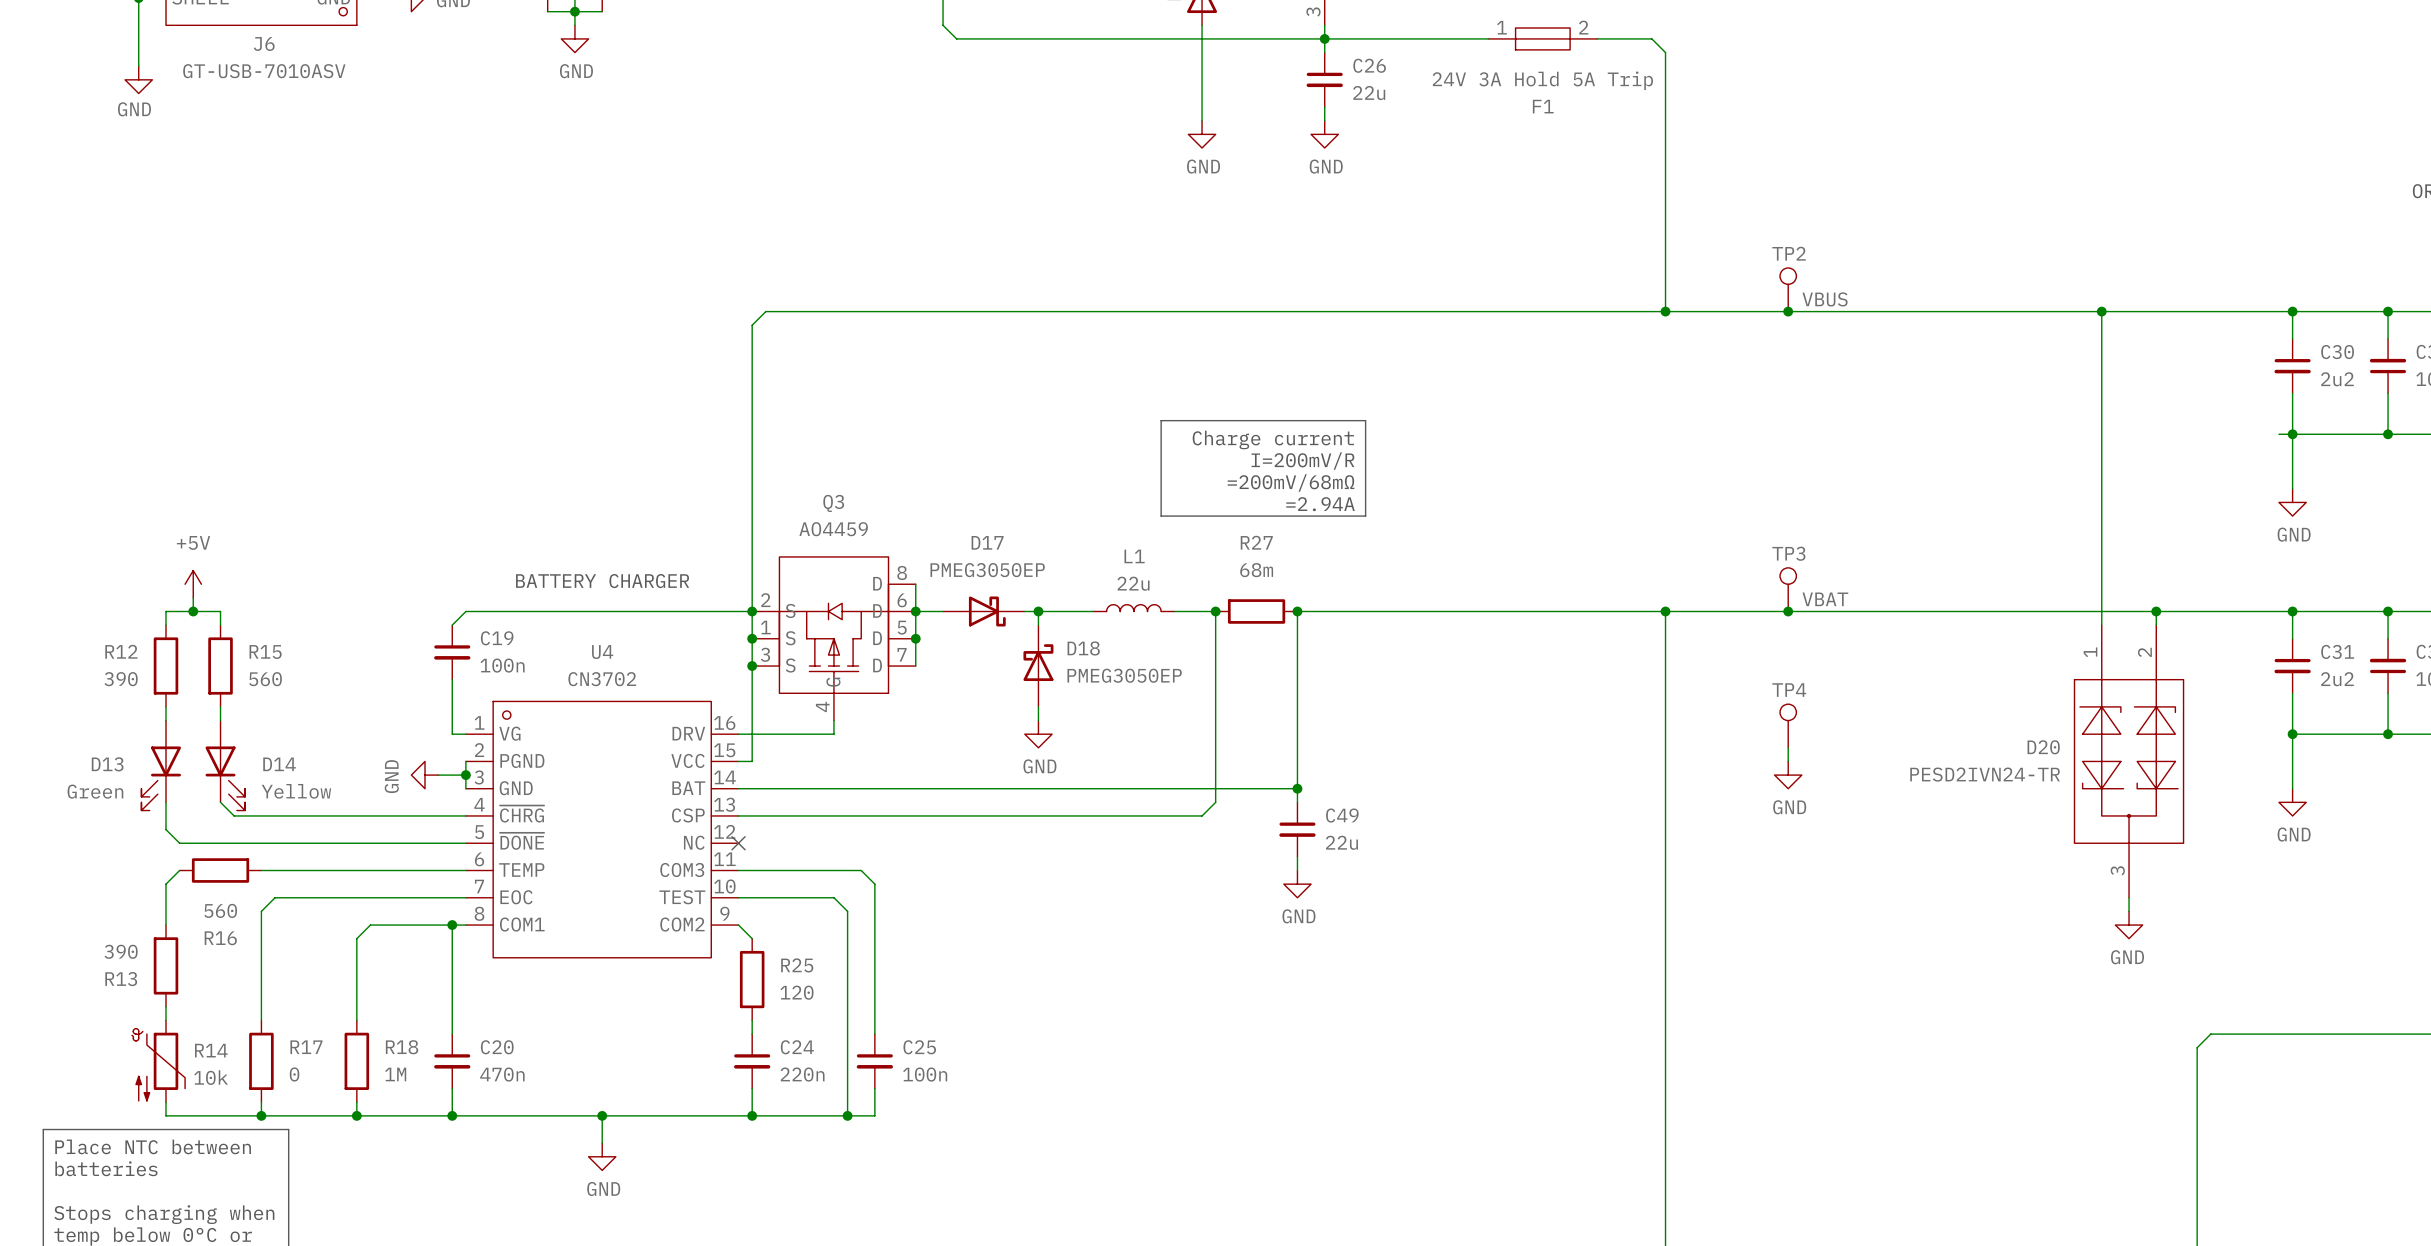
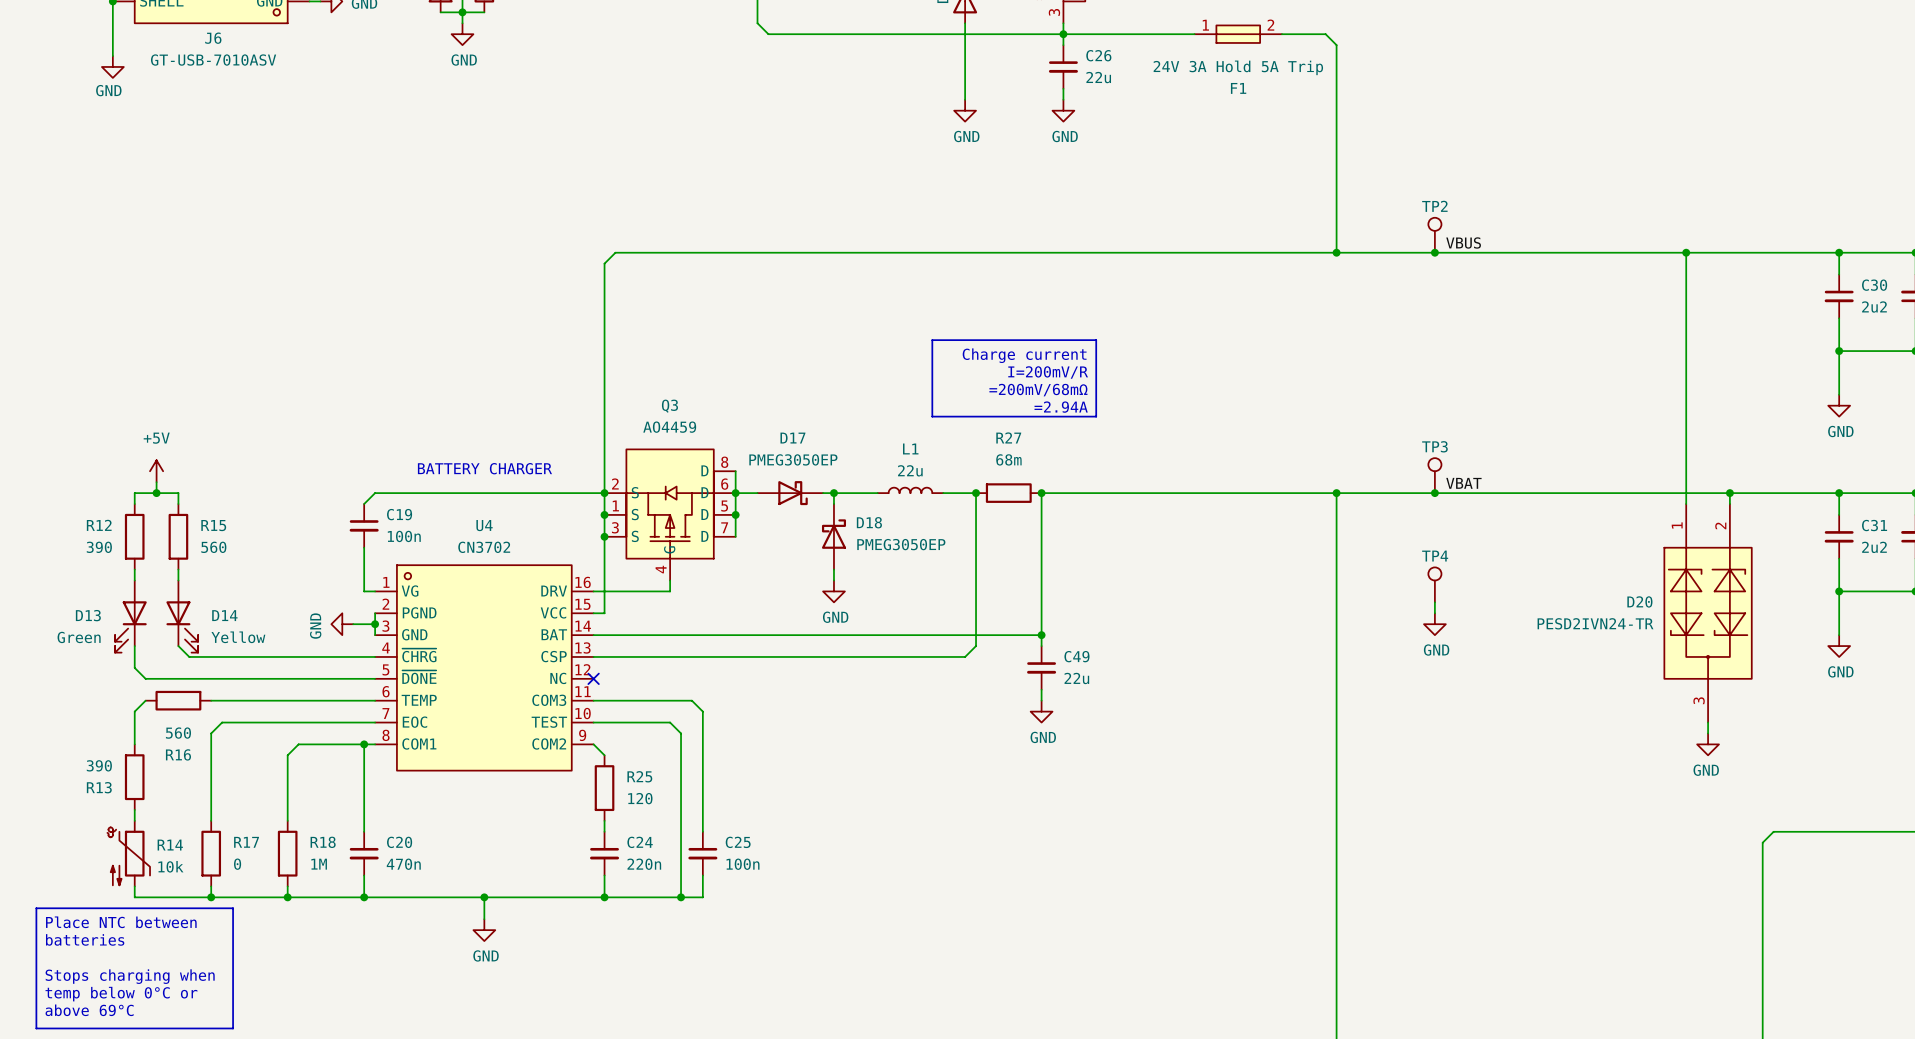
wire: (2278, 434) (2292, 434) -> none

